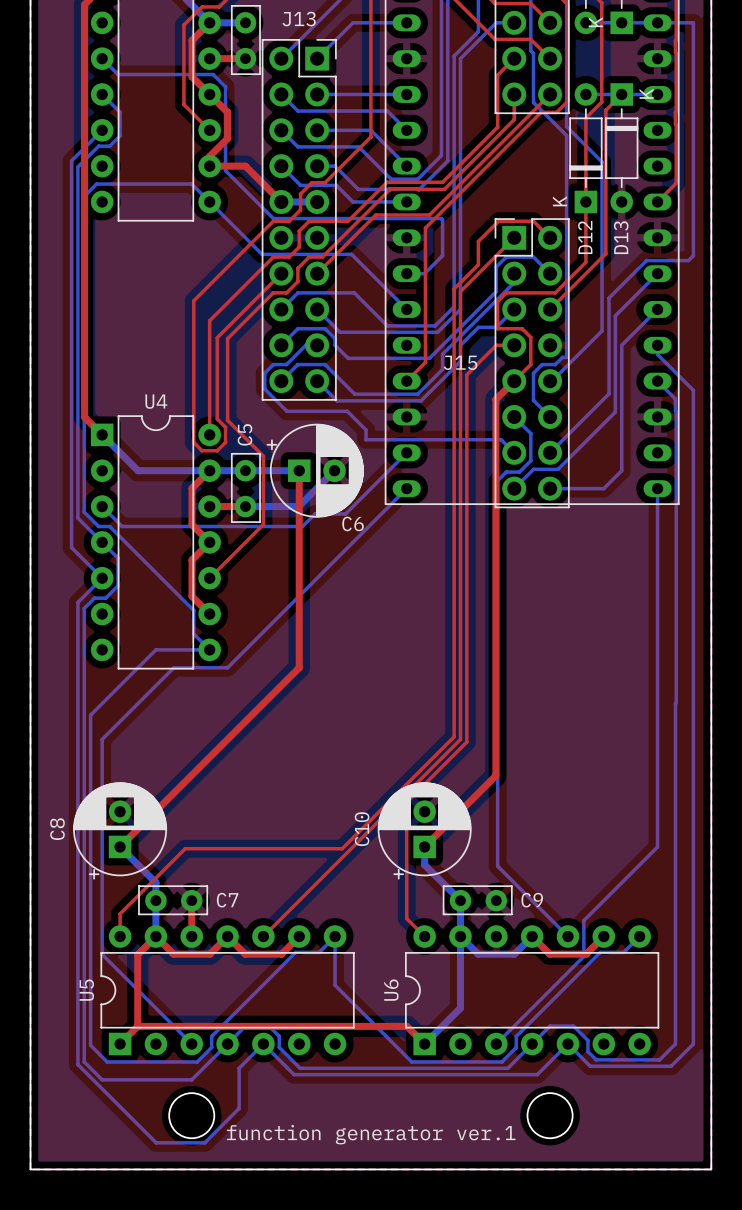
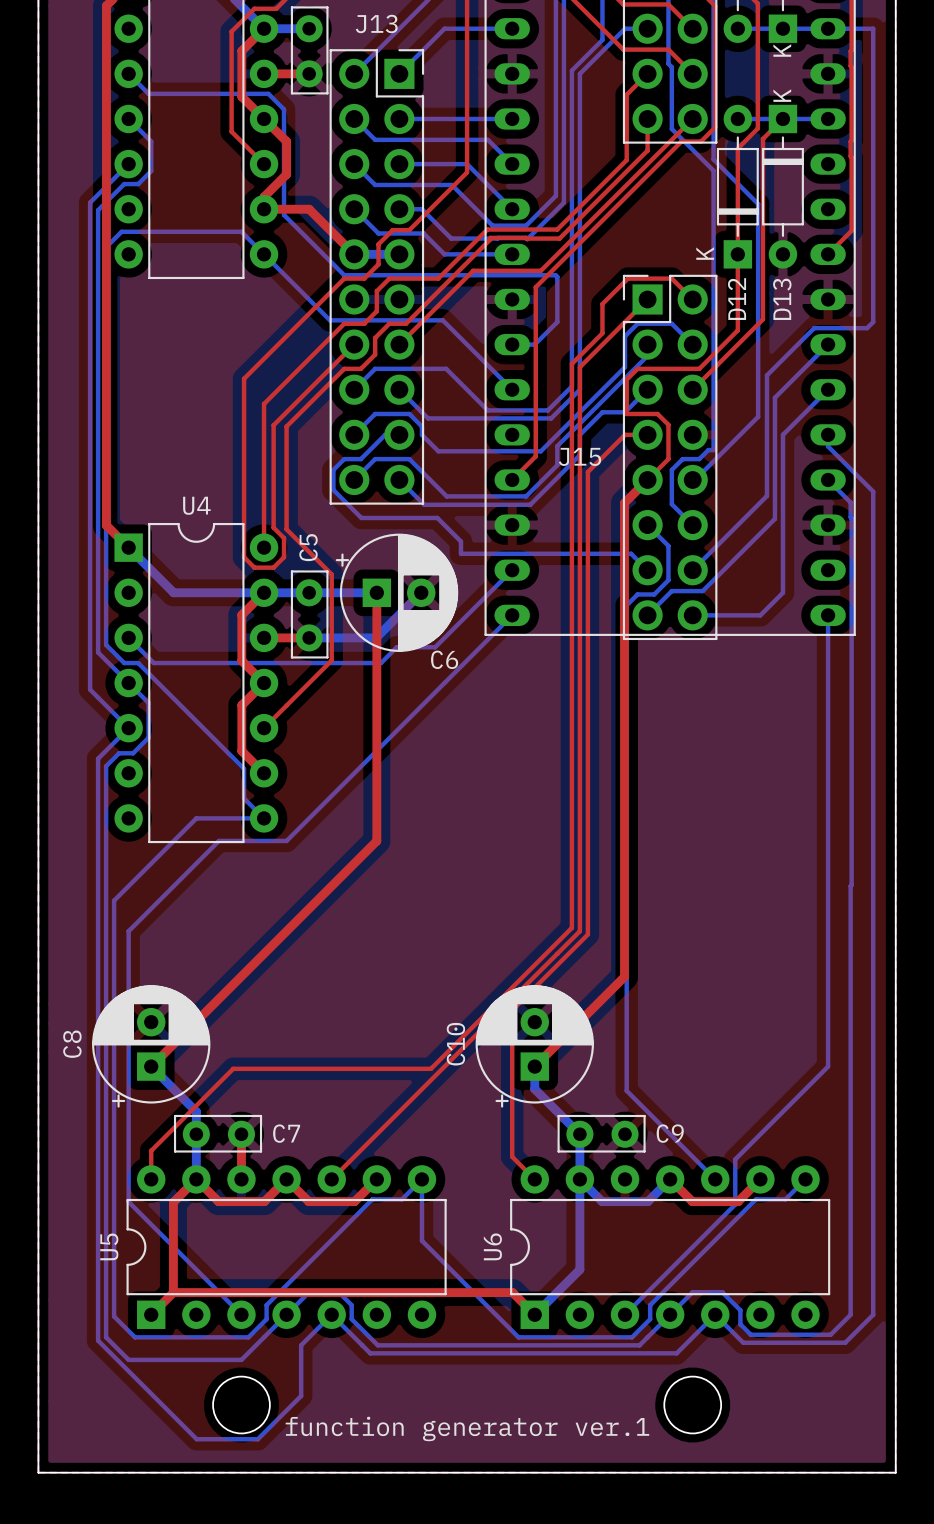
part text position: K (595, 22) -> K (782, 50)
D13 text position: K (646, 93) -> K (782, 95)

